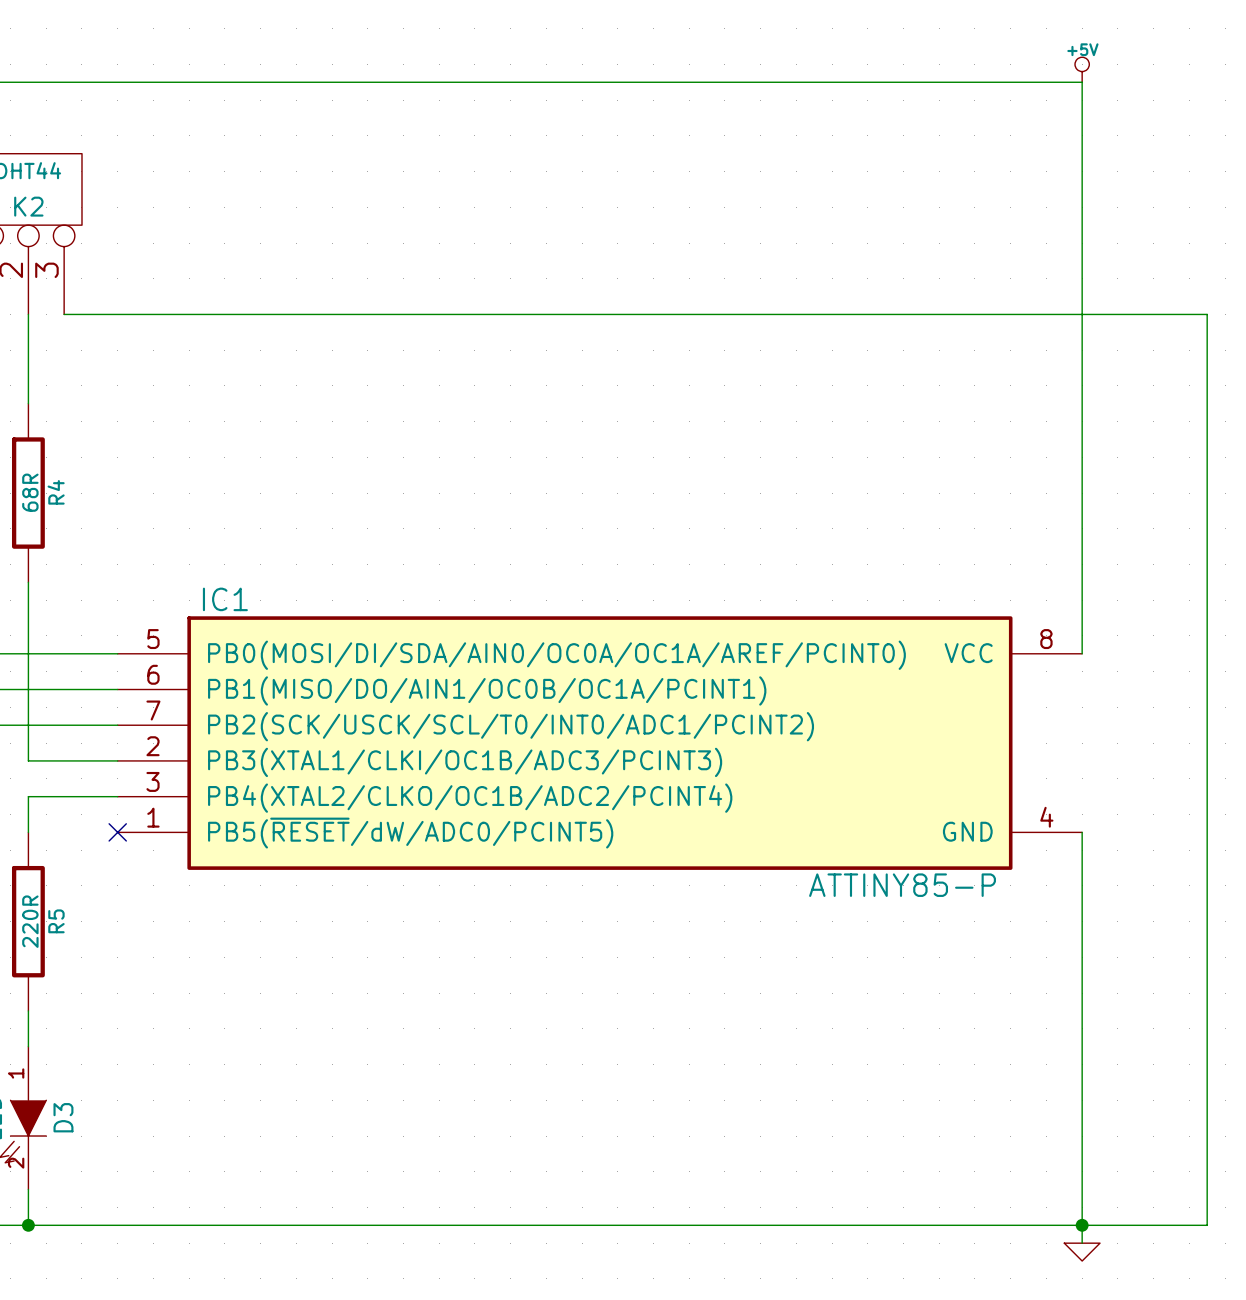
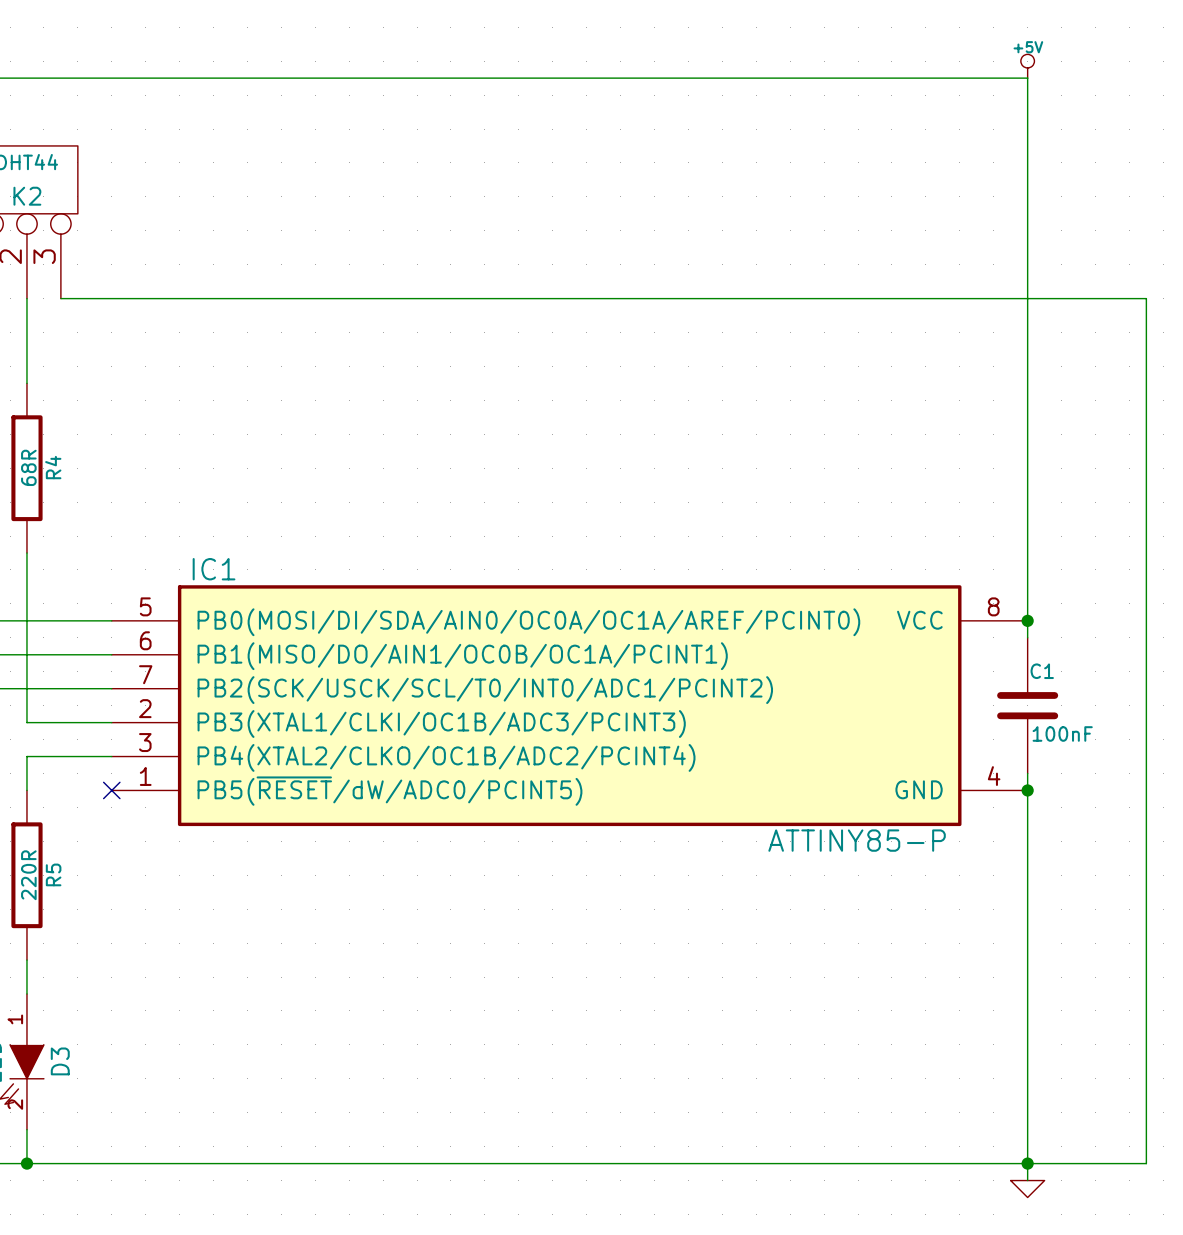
wire: none -> (1027, 620) (1027, 637)
junction: none -> (1027, 620)
C1: none -> 100nF (1027, 705)
wire: none -> (1027, 773) (1027, 790)
junction: none -> (1027, 790)

